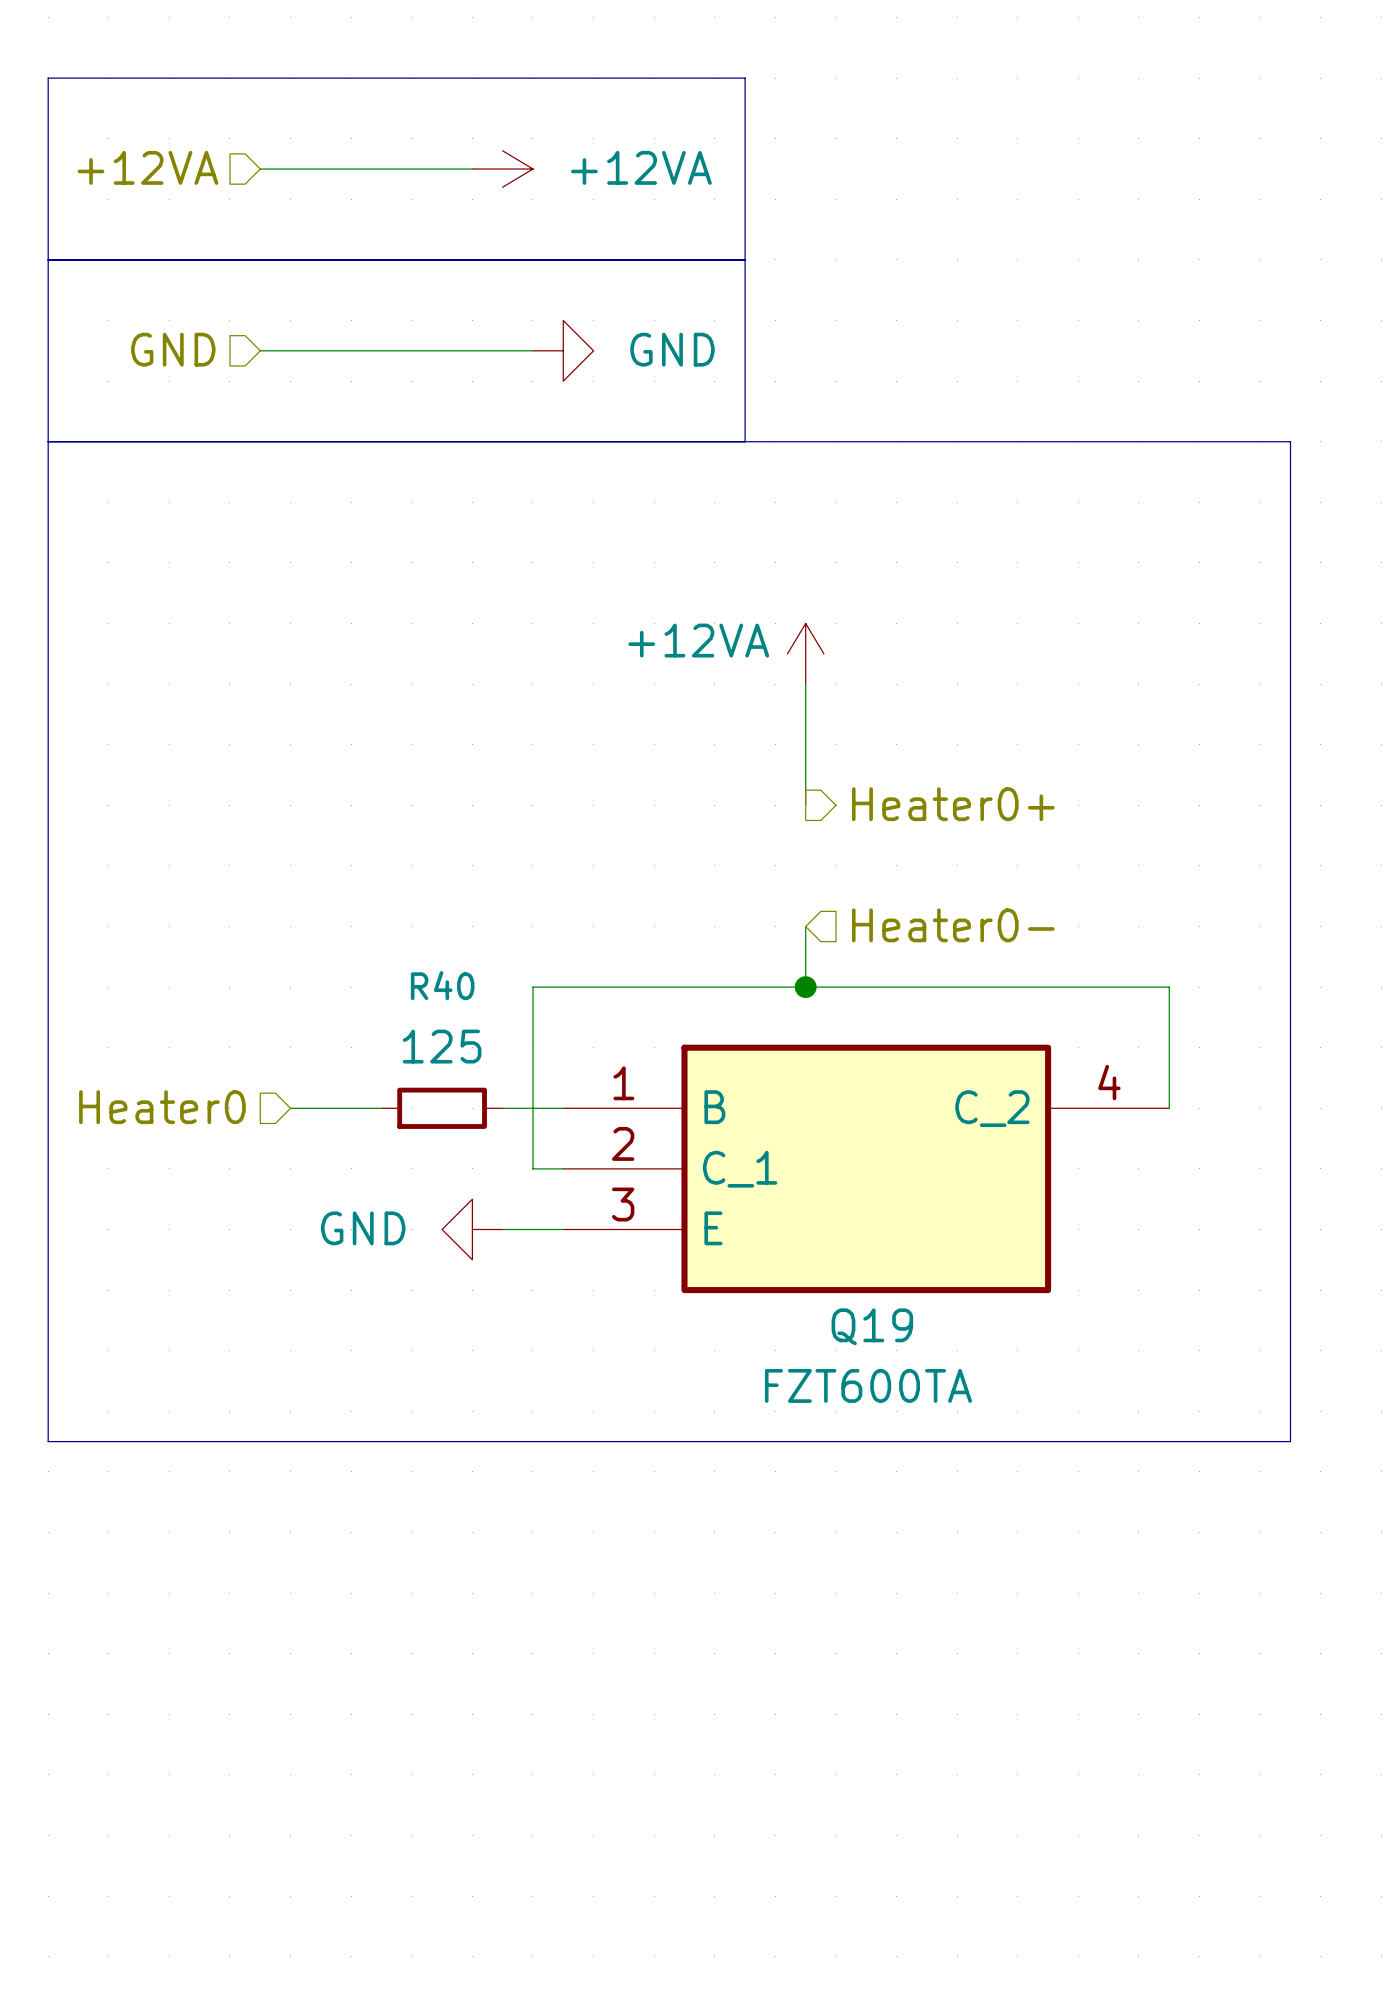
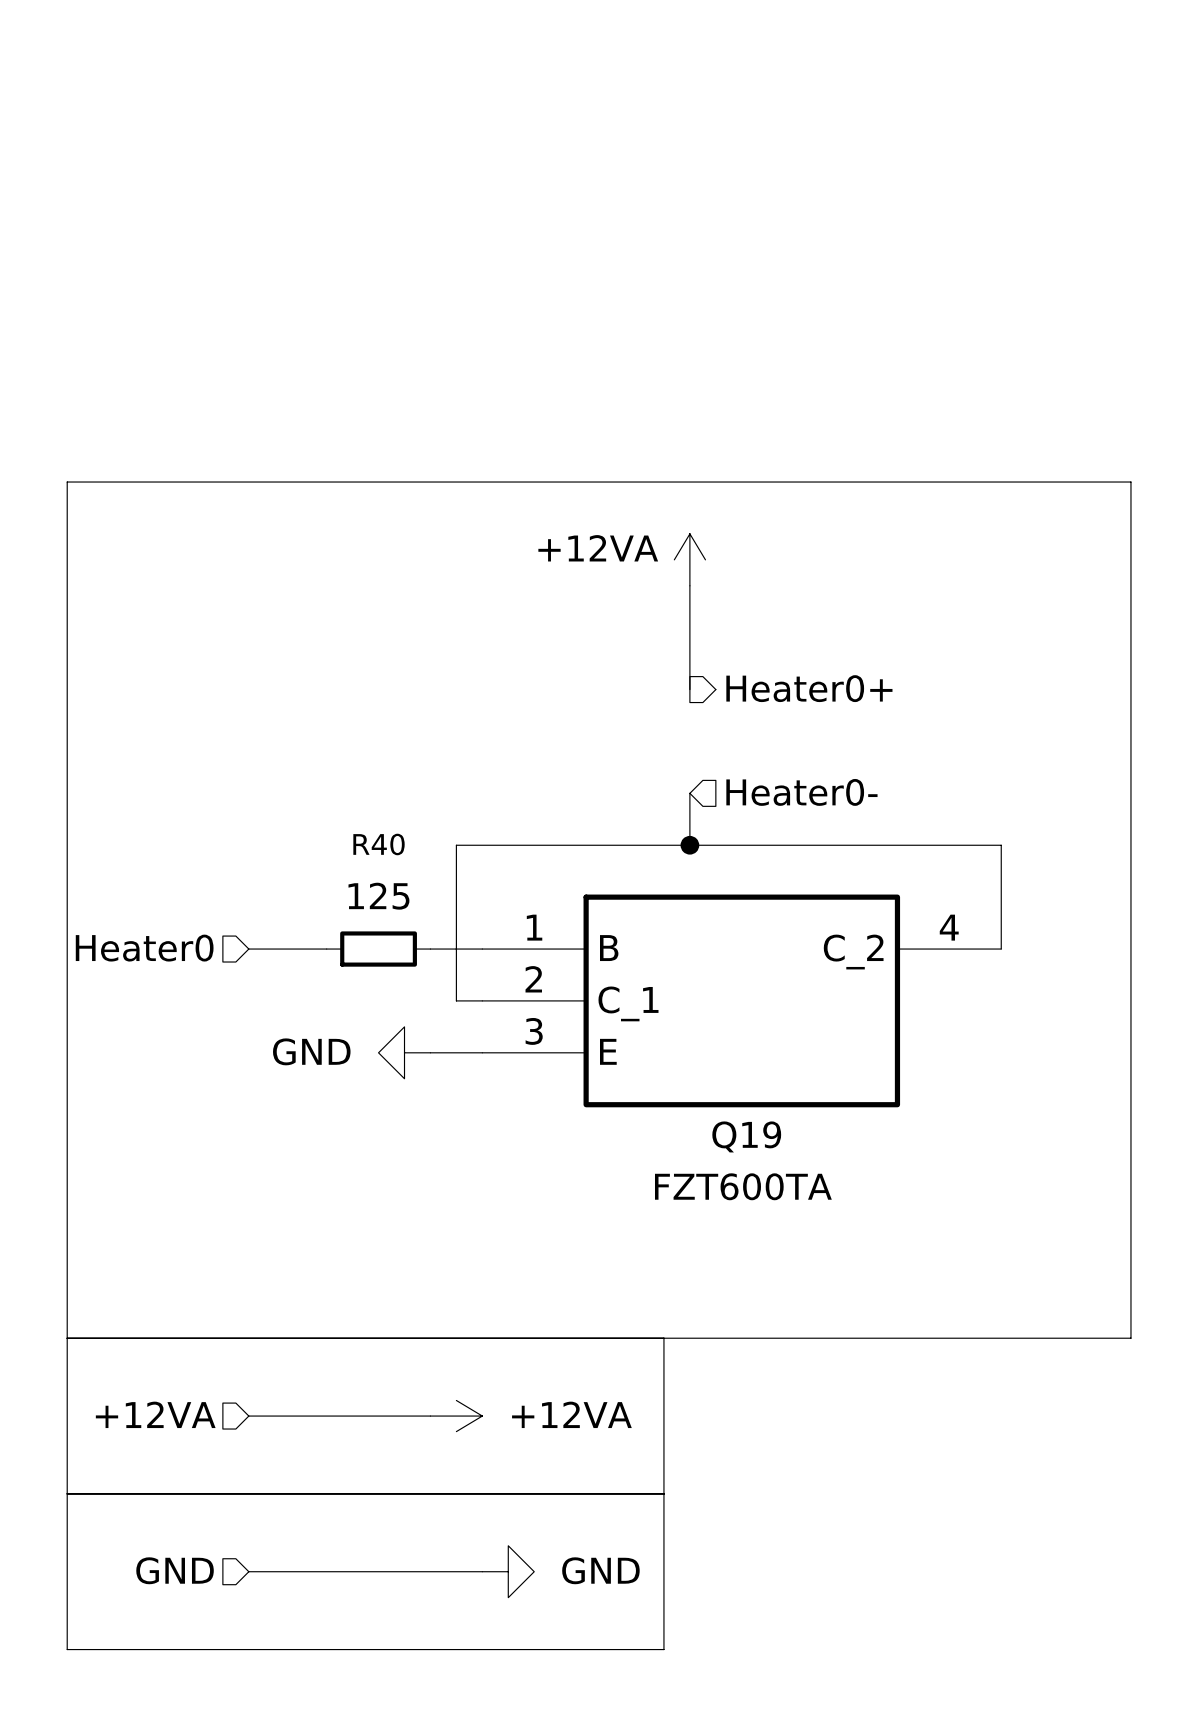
hierarchical label: +12VA (148, 167) -> none
wire: (260, 169) (472, 169) -> none
power symbol: +12VA (502, 169) -> none
line: (48, 259) (745, 259) -> none
hierarchical label: GND (173, 349) -> none
wire: (260, 350) (532, 350) -> none
power symbol: GND (563, 350) -> none
line: (48, 441) (1290, 441) (1290, 1441) (48, 1441) (48, 78) (745, 78) (745, 441) -> none
line: none -> (67, 1338) (1130, 1338) (1130, 482) (67, 482) (67, 1649) (663, 1649) (663, 1338)
hierarchical label: none -> +12VA (155, 1414)
wire: none -> (248, 1416) (430, 1416)
power symbol: none -> +12VA (456, 1416)
line: none -> (67, 1493) (663, 1493)
hierarchical label: none -> GND (175, 1570)
wire: none -> (248, 1571) (482, 1571)
power symbol: none -> GND (508, 1571)

